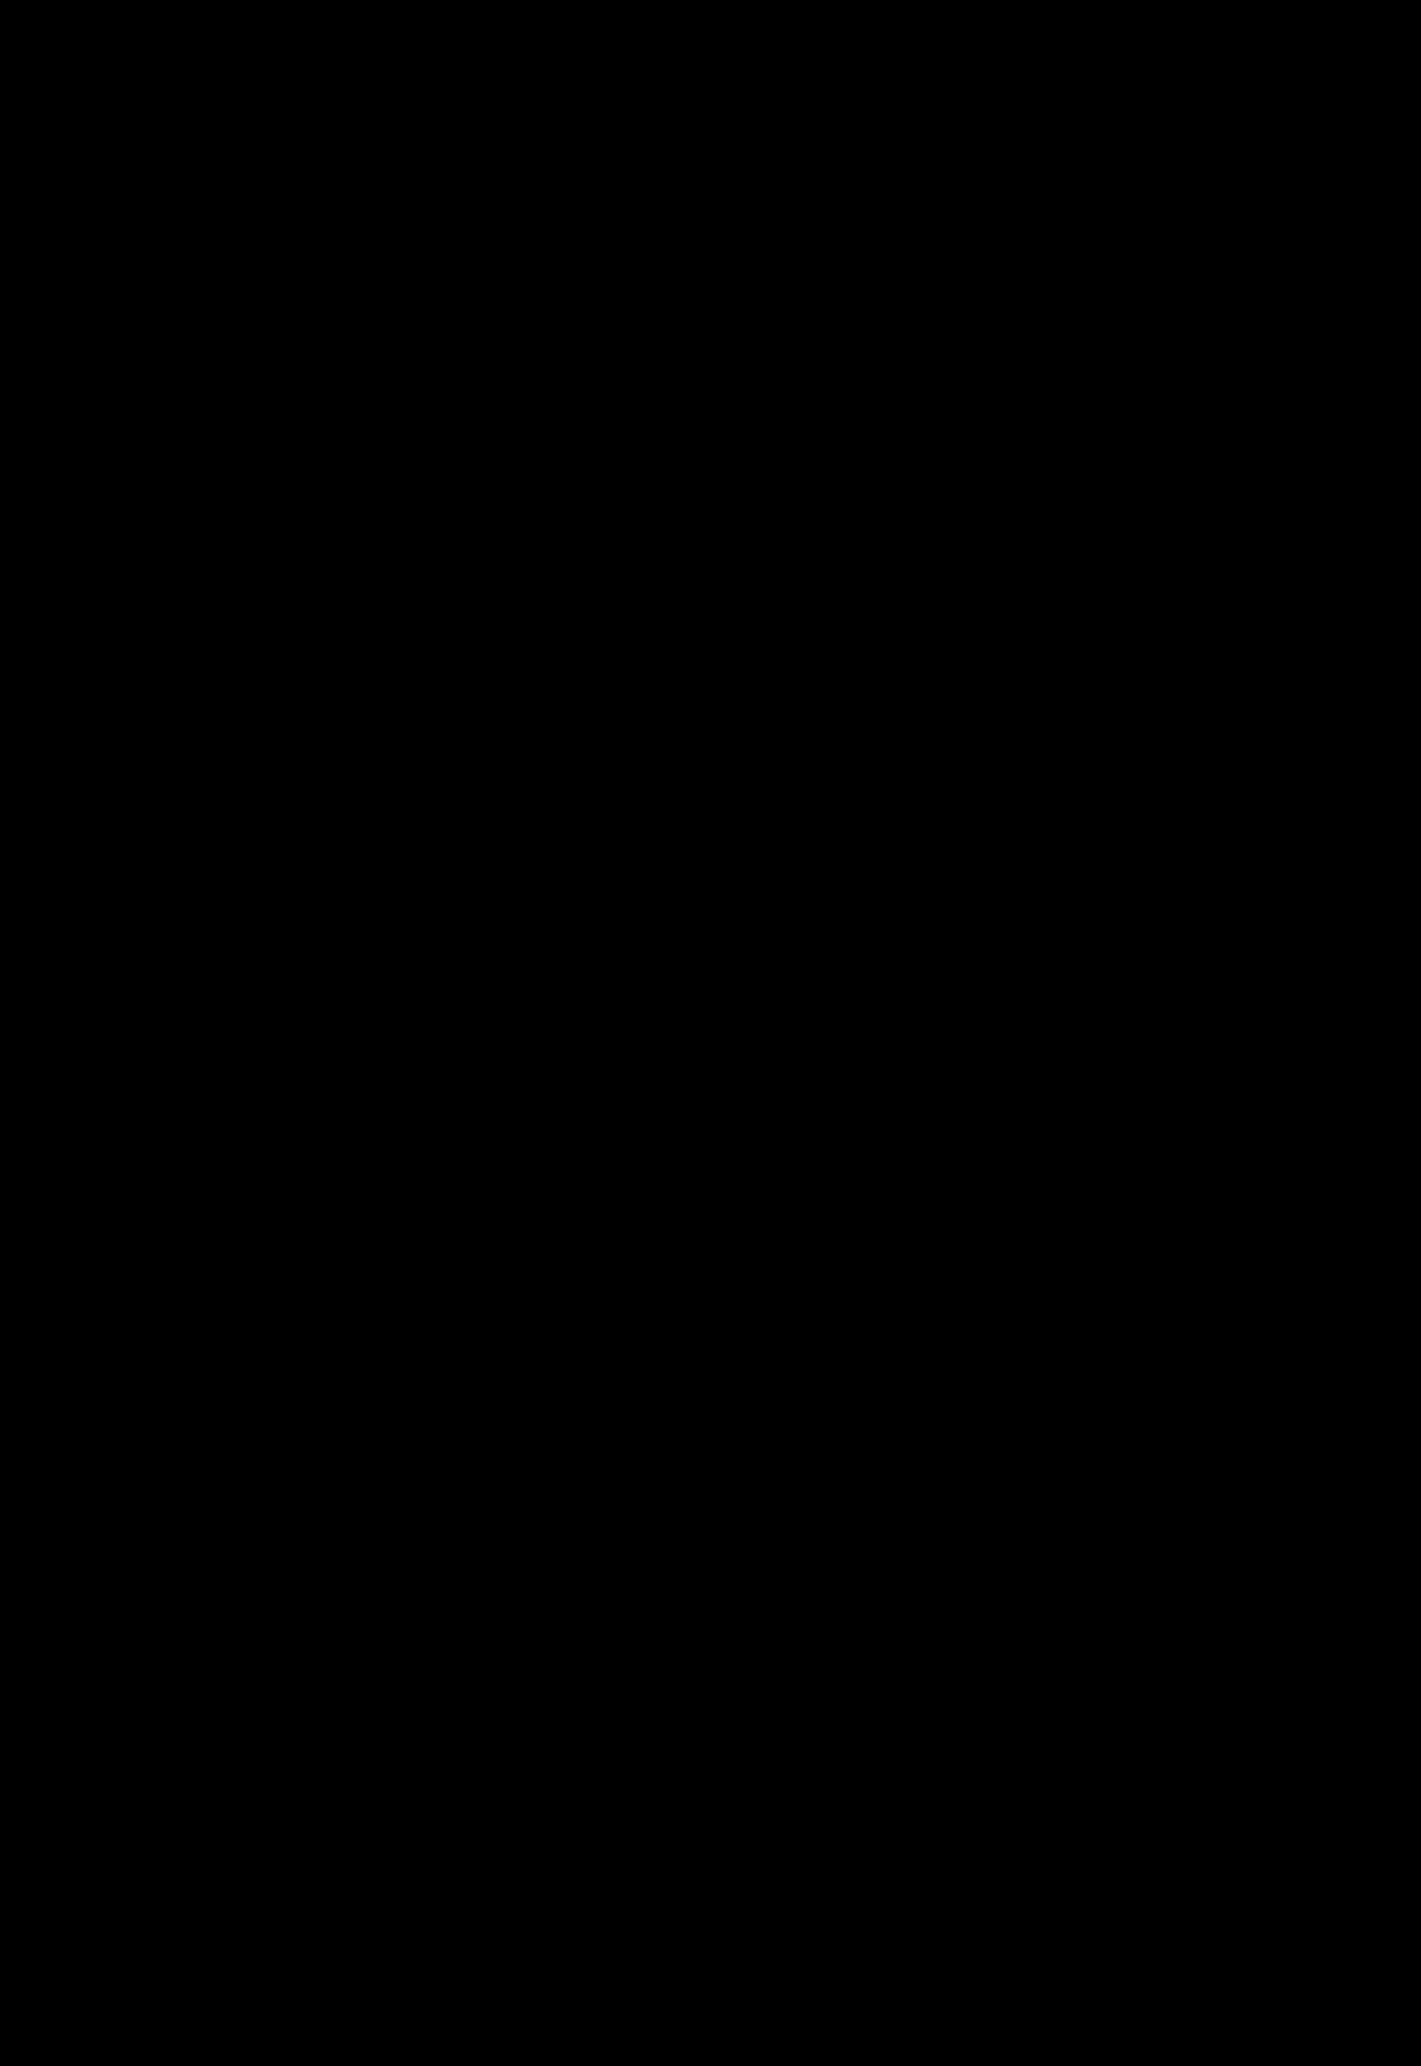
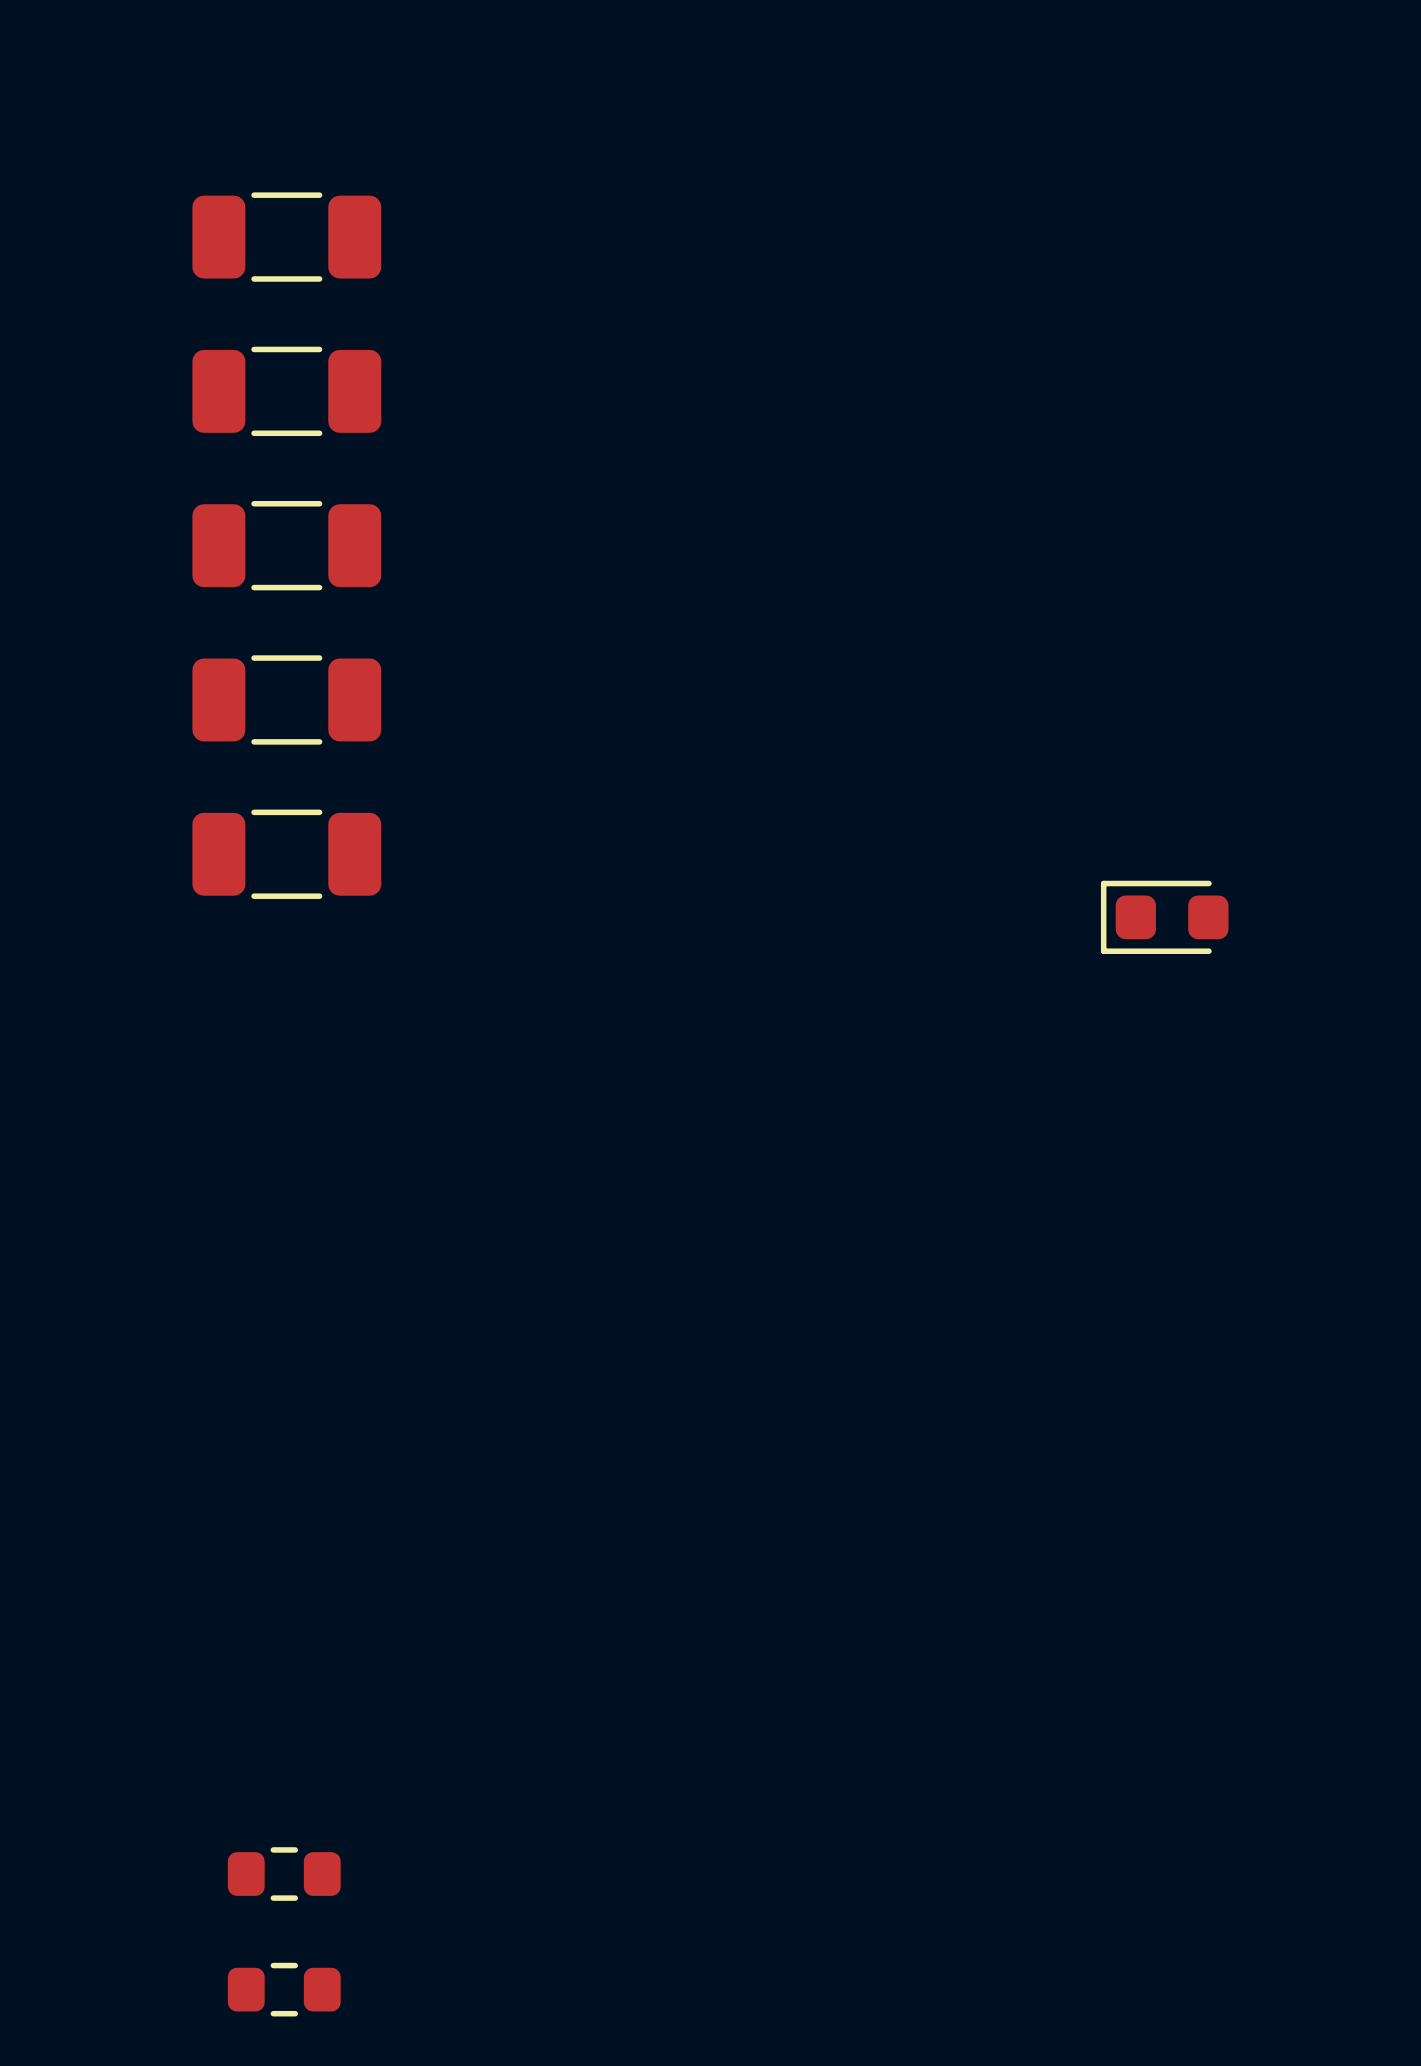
part: none -> (286, 237)
part: none -> (286, 391)
part: none -> (286, 545)
part: none -> (286, 699)
part: none -> (286, 854)
part: none -> (1164, 917)
part: none -> (284, 1874)
part: none -> (284, 1989)

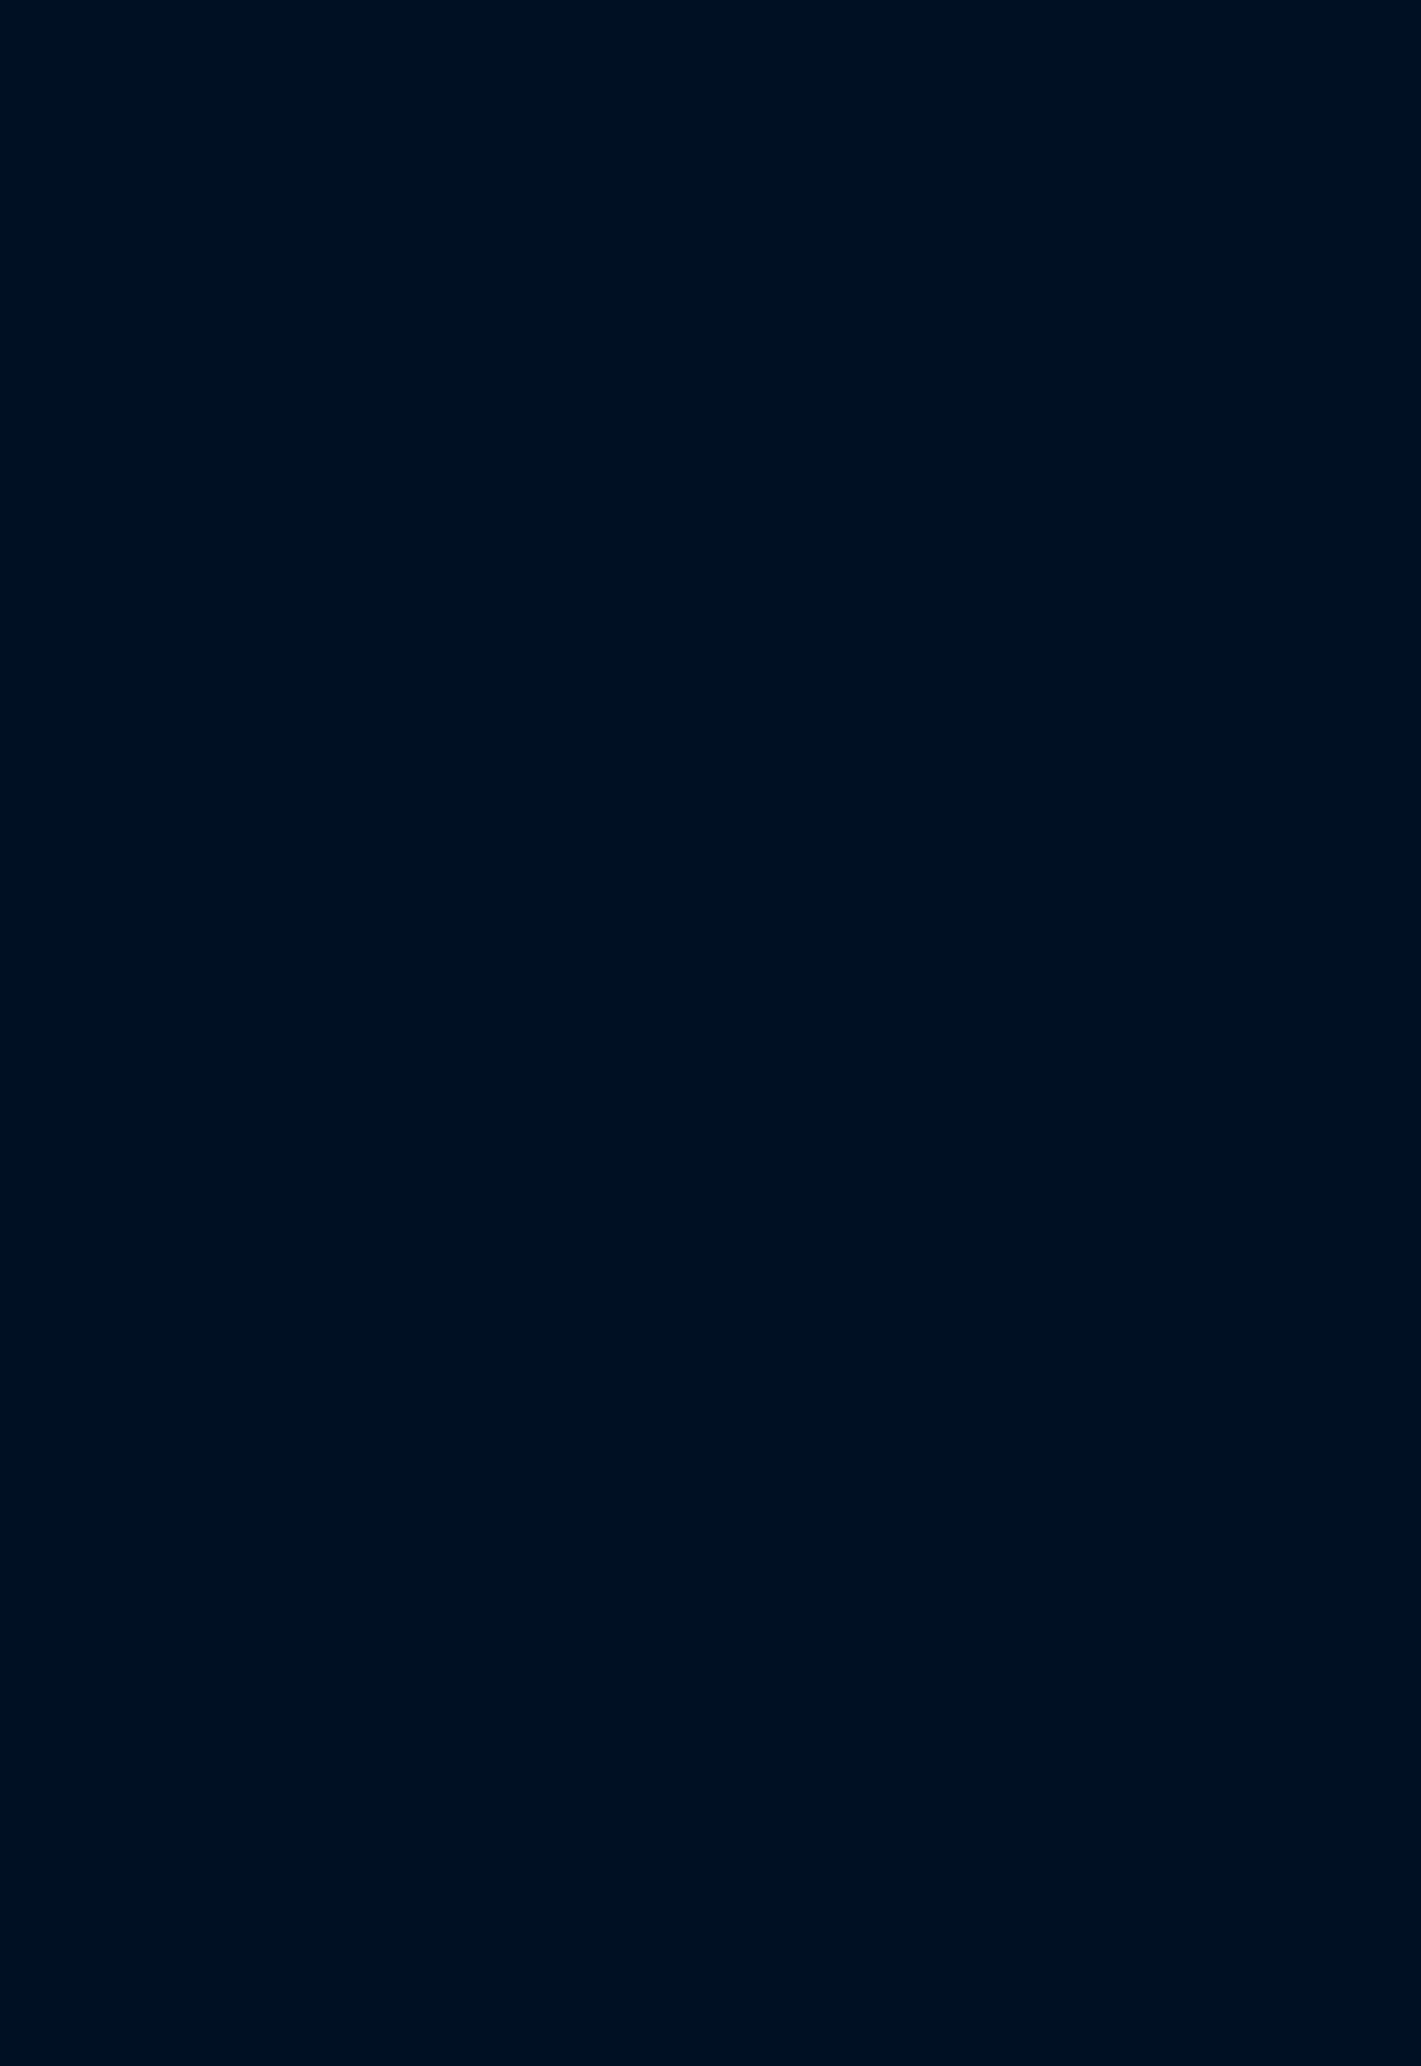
part: (286, 237) -> none
part: (286, 391) -> none
part: (286, 545) -> none
part: (286, 699) -> none
part: (286, 854) -> none
part: (1164, 917) -> none
part: (284, 1874) -> none
part: (284, 1989) -> none

